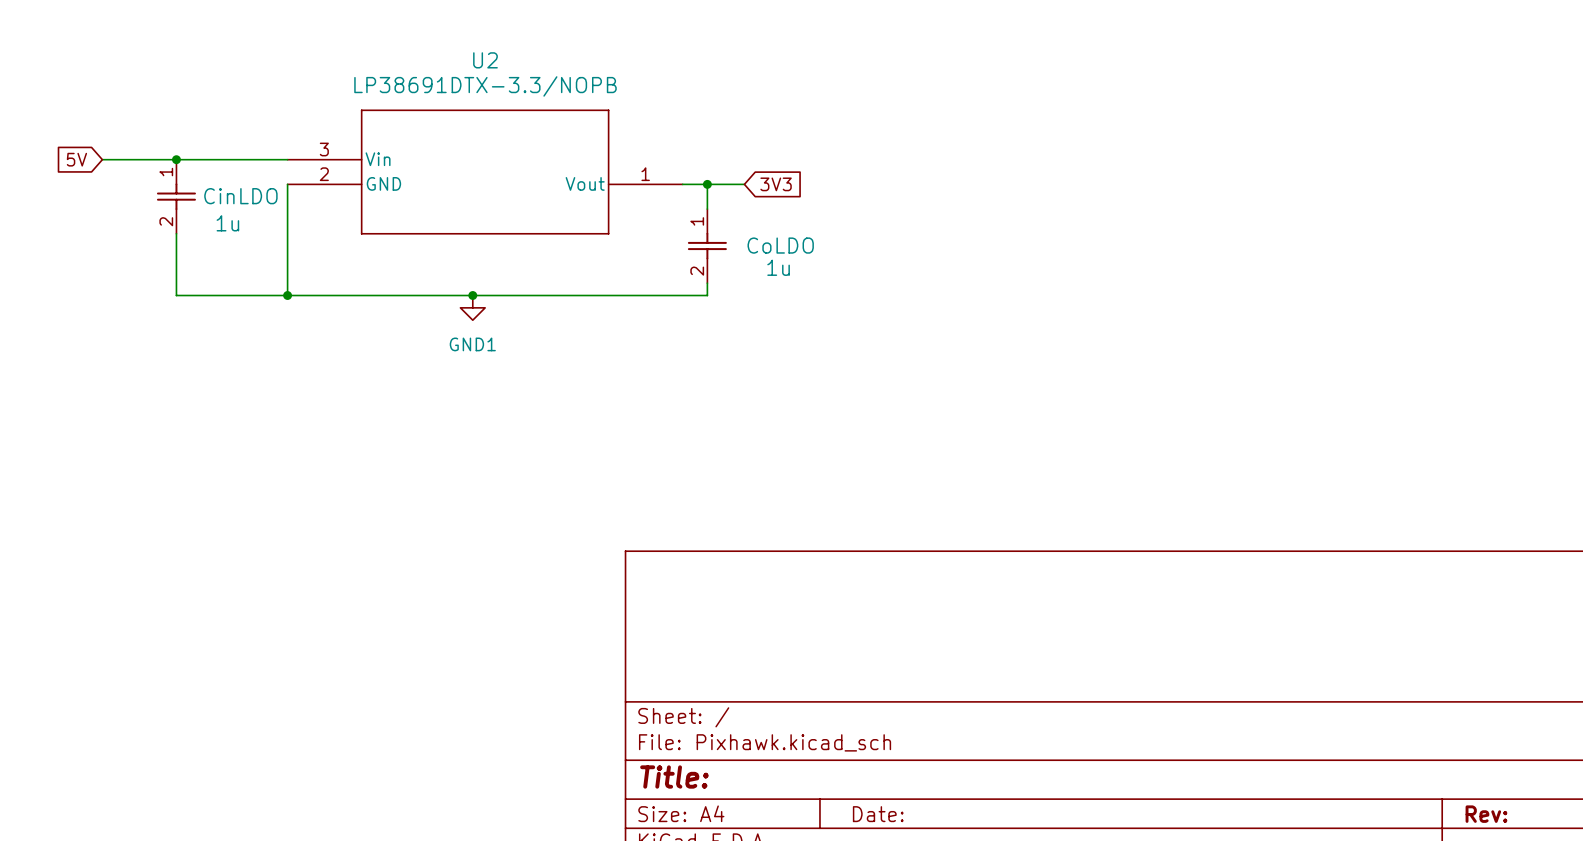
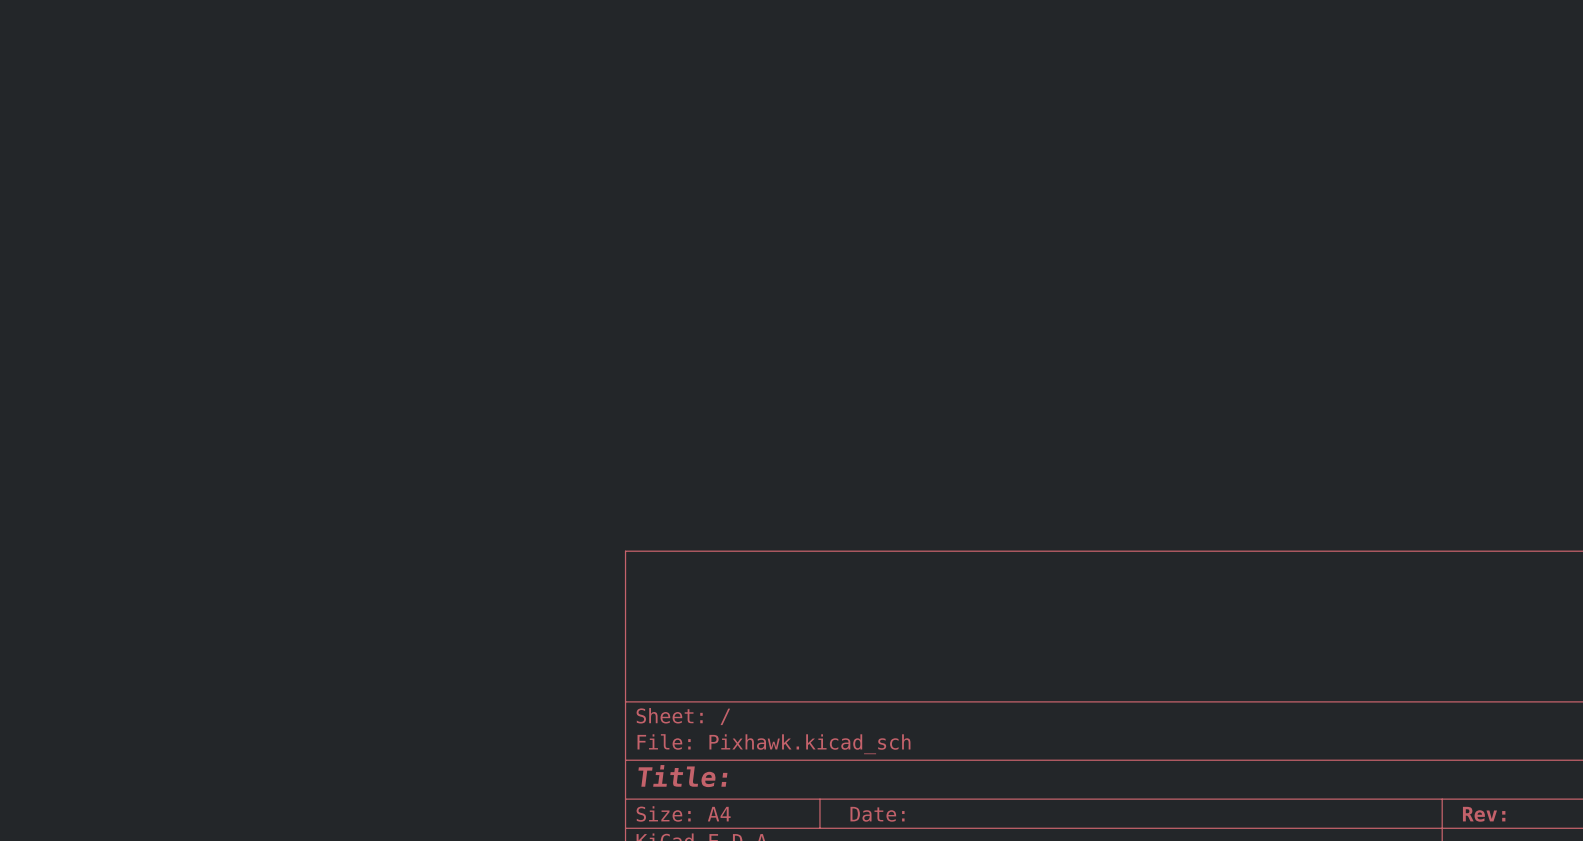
global label: 5V (76, 159) -> none
wire: (102, 159) (287, 159) -> none
junction: (176, 159) -> none
U2: LP38691DTX-3.3/NOPB (485, 172) -> none
wire: (287, 184) (287, 295) -> none
wire: (682, 184) (744, 184) -> none
wire: (707, 184) (707, 209) -> none
junction: (707, 184) -> none
global label: 3V3 (776, 184) -> none
CinLDO: 1u (176, 196) -> none
wire: (176, 233) (176, 295) (707, 295) (707, 283) -> none
CoLDO: 1u (707, 246) -> none
junction: (287, 295) -> none
junction: (472, 295) -> none
power symbol: GND1 (472, 307) -> none

